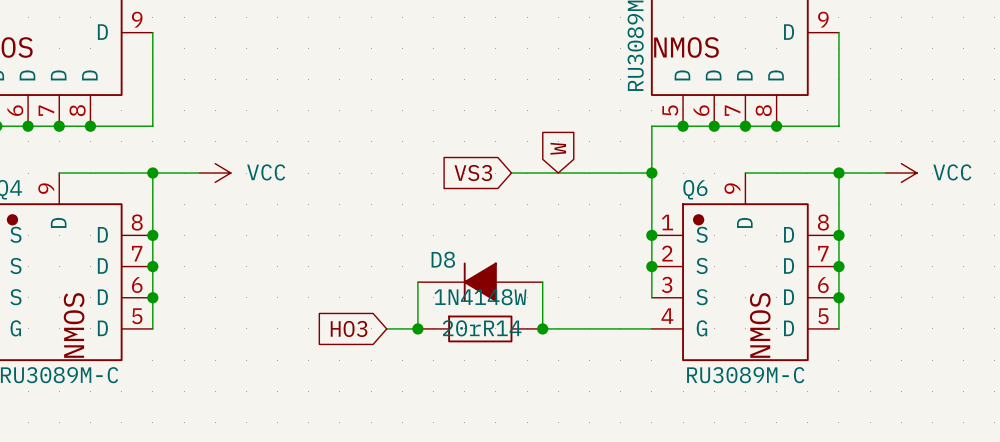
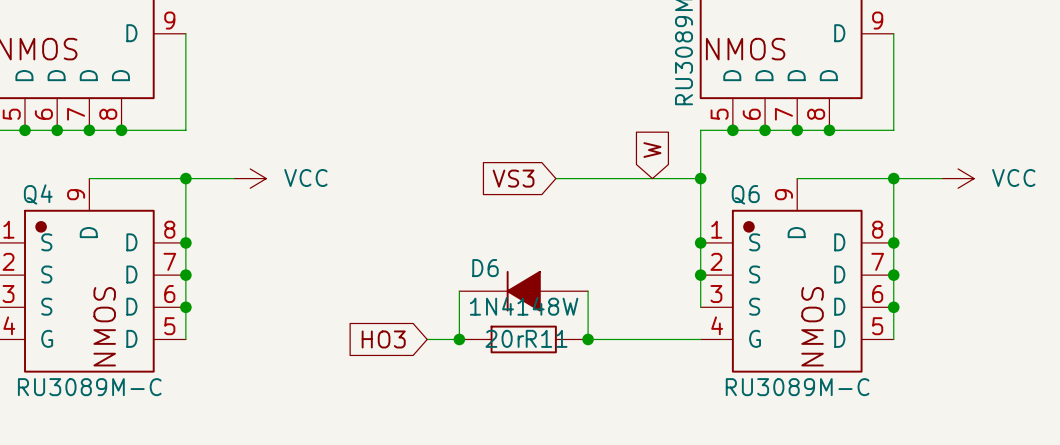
global label position: W (558, 148) -> W (652, 150)
D8 name: D8 (443, 259) -> D6 (485, 268)
R14 name: R14 (502, 328) -> R11 (546, 338)

